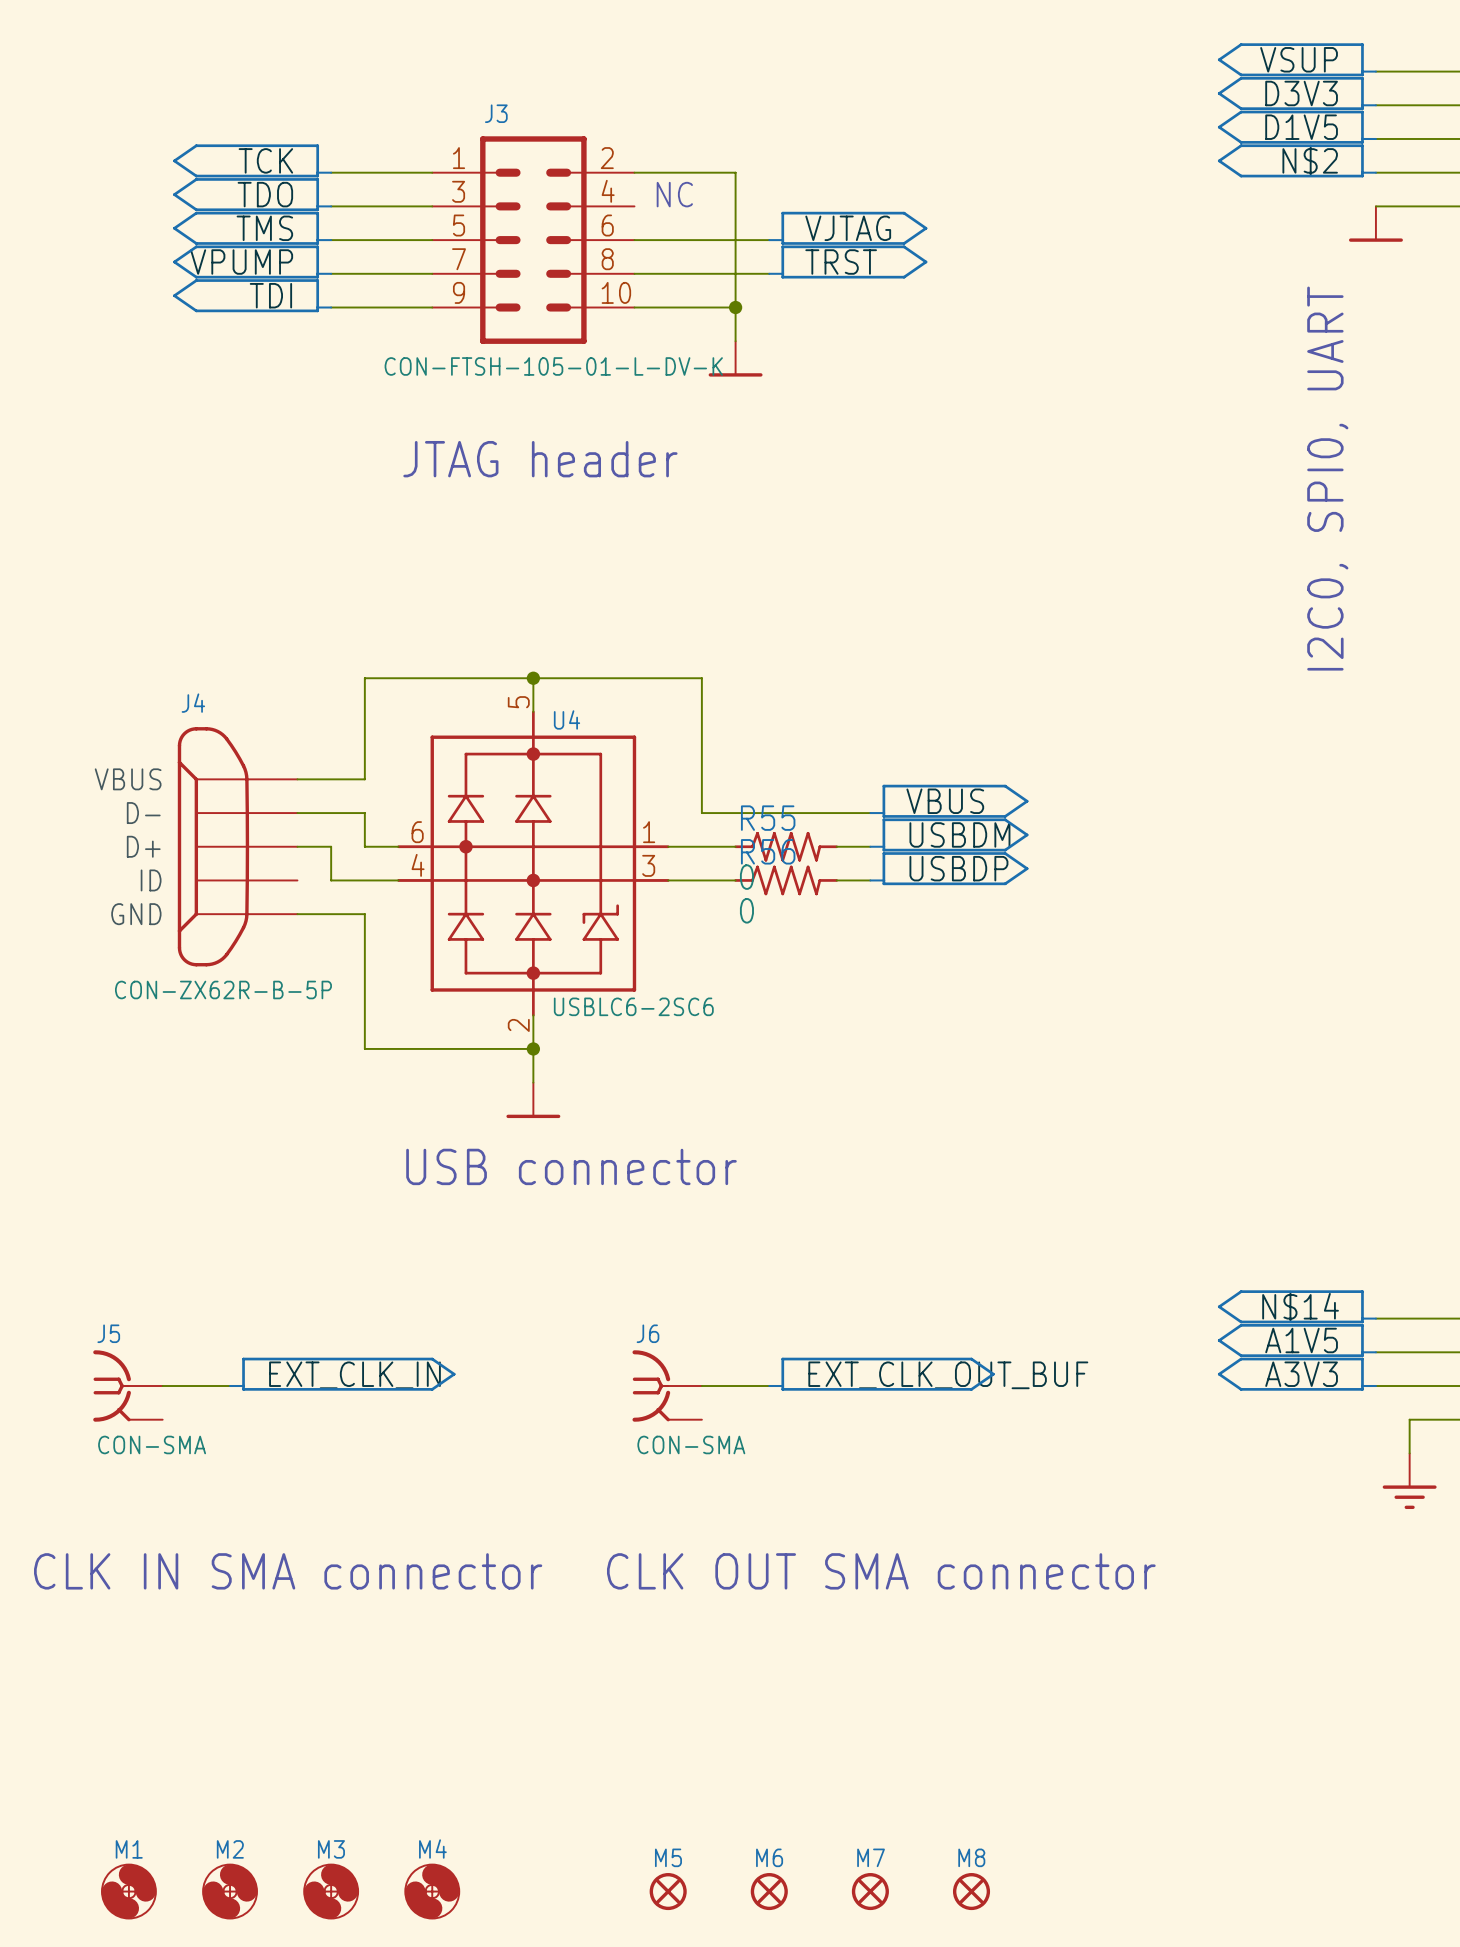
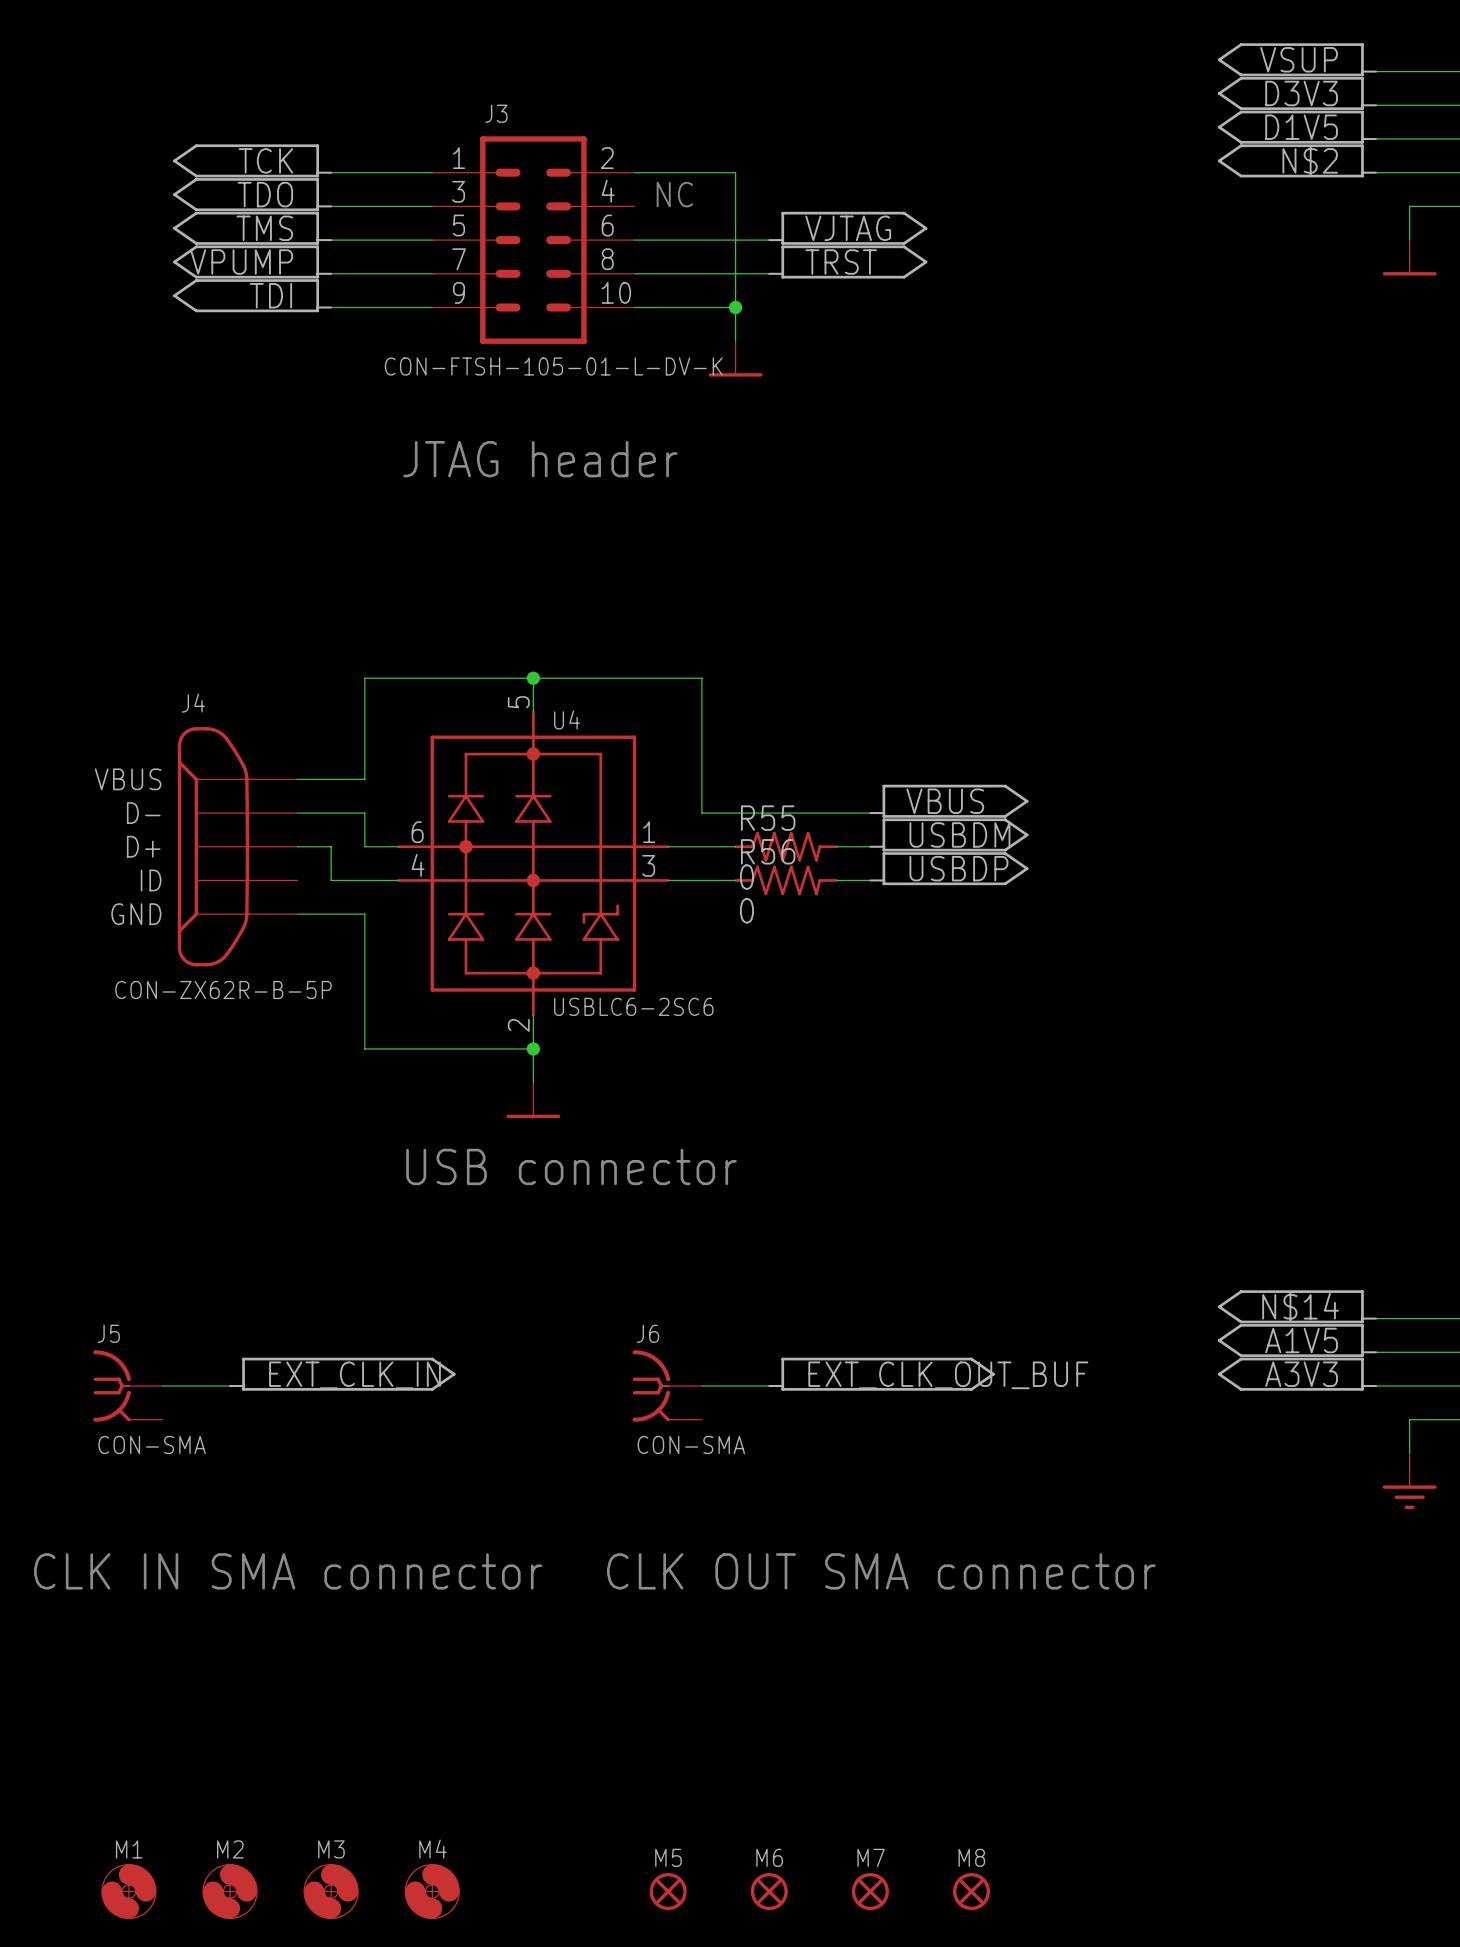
wire: (1375, 206) (1409, 206) -> (1409, 240) (1409, 206)
power symbol position: (1375, 224) -> (1409, 257)
text: I2C0, SPI0, UART (1327, 478) -> none

